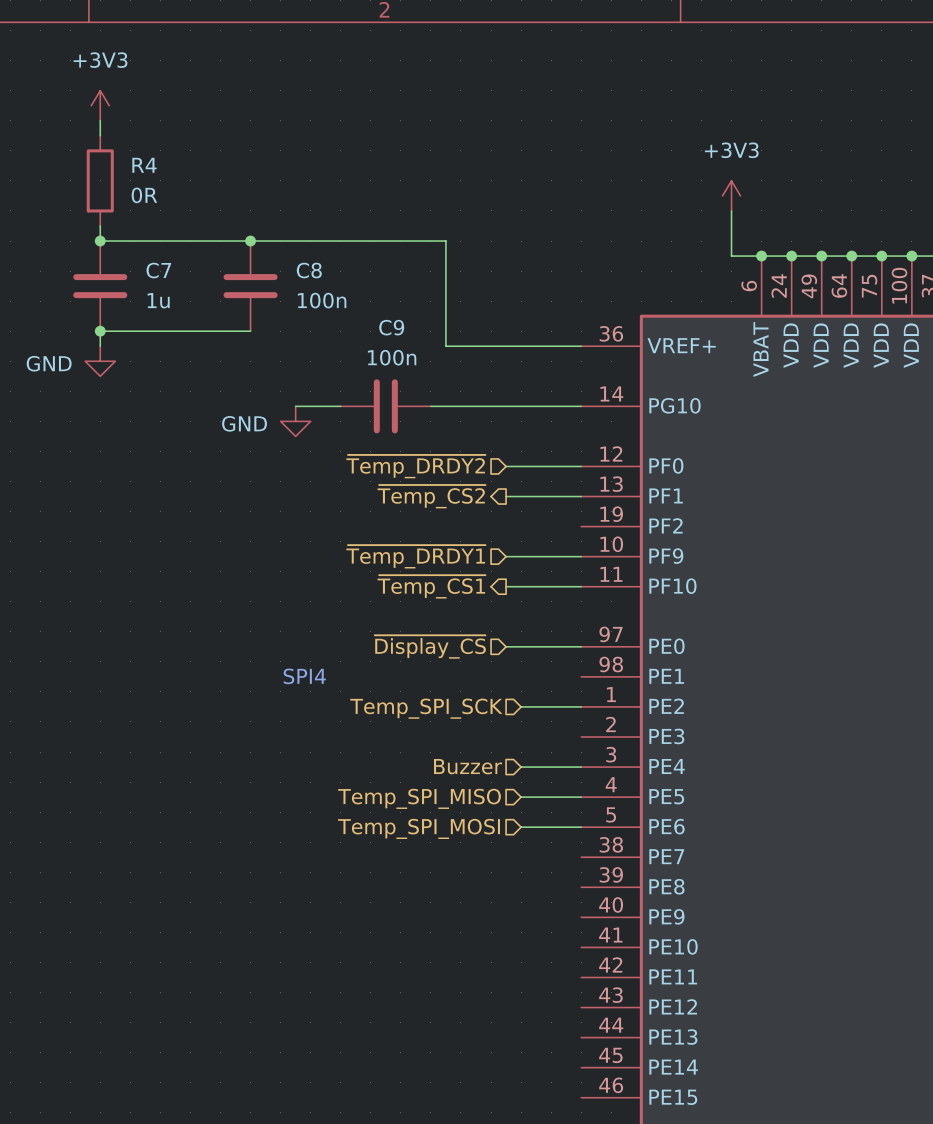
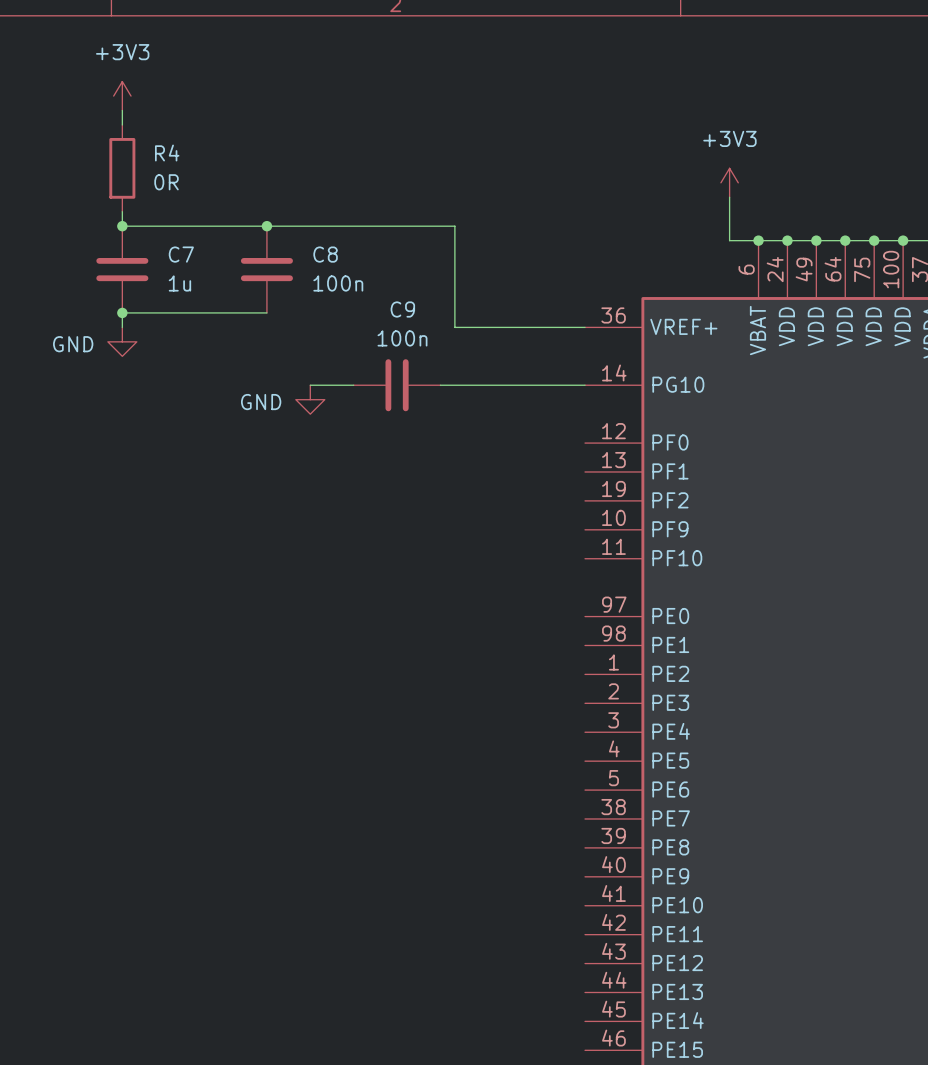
hierarchical label: ~{Temp_DRDY2} (415, 466) -> none
wire: (506, 466) (581, 466) -> none
hierarchical label: ~{Temp_CS2} (431, 496) -> none
wire: (506, 496) (581, 496) -> none
hierarchical label: ~{Temp_DRDY1} (415, 556) -> none
wire: (506, 556) (581, 556) -> none
hierarchical label: ~{Temp_CS1} (431, 586) -> none
wire: (506, 586) (581, 586) -> none
hierarchical label: ~{Display_CS} (430, 646) -> none
wire: (506, 646) (581, 646) -> none
text: SPI4 (304, 676) -> none
wire: (521, 706) (581, 706) -> none
hierarchical label: Temp_SPI_SCK (426, 708) -> none
hierarchical label: Buzzer (468, 766) -> none
wire: (521, 767) (581, 767) -> none
wire: (521, 797) (581, 797) -> none
hierarchical label: Temp_SPI_MISO (419, 798) -> none
wire: (521, 827) (581, 827) -> none
hierarchical label: Temp_SPI_MOSI (419, 828) -> none

